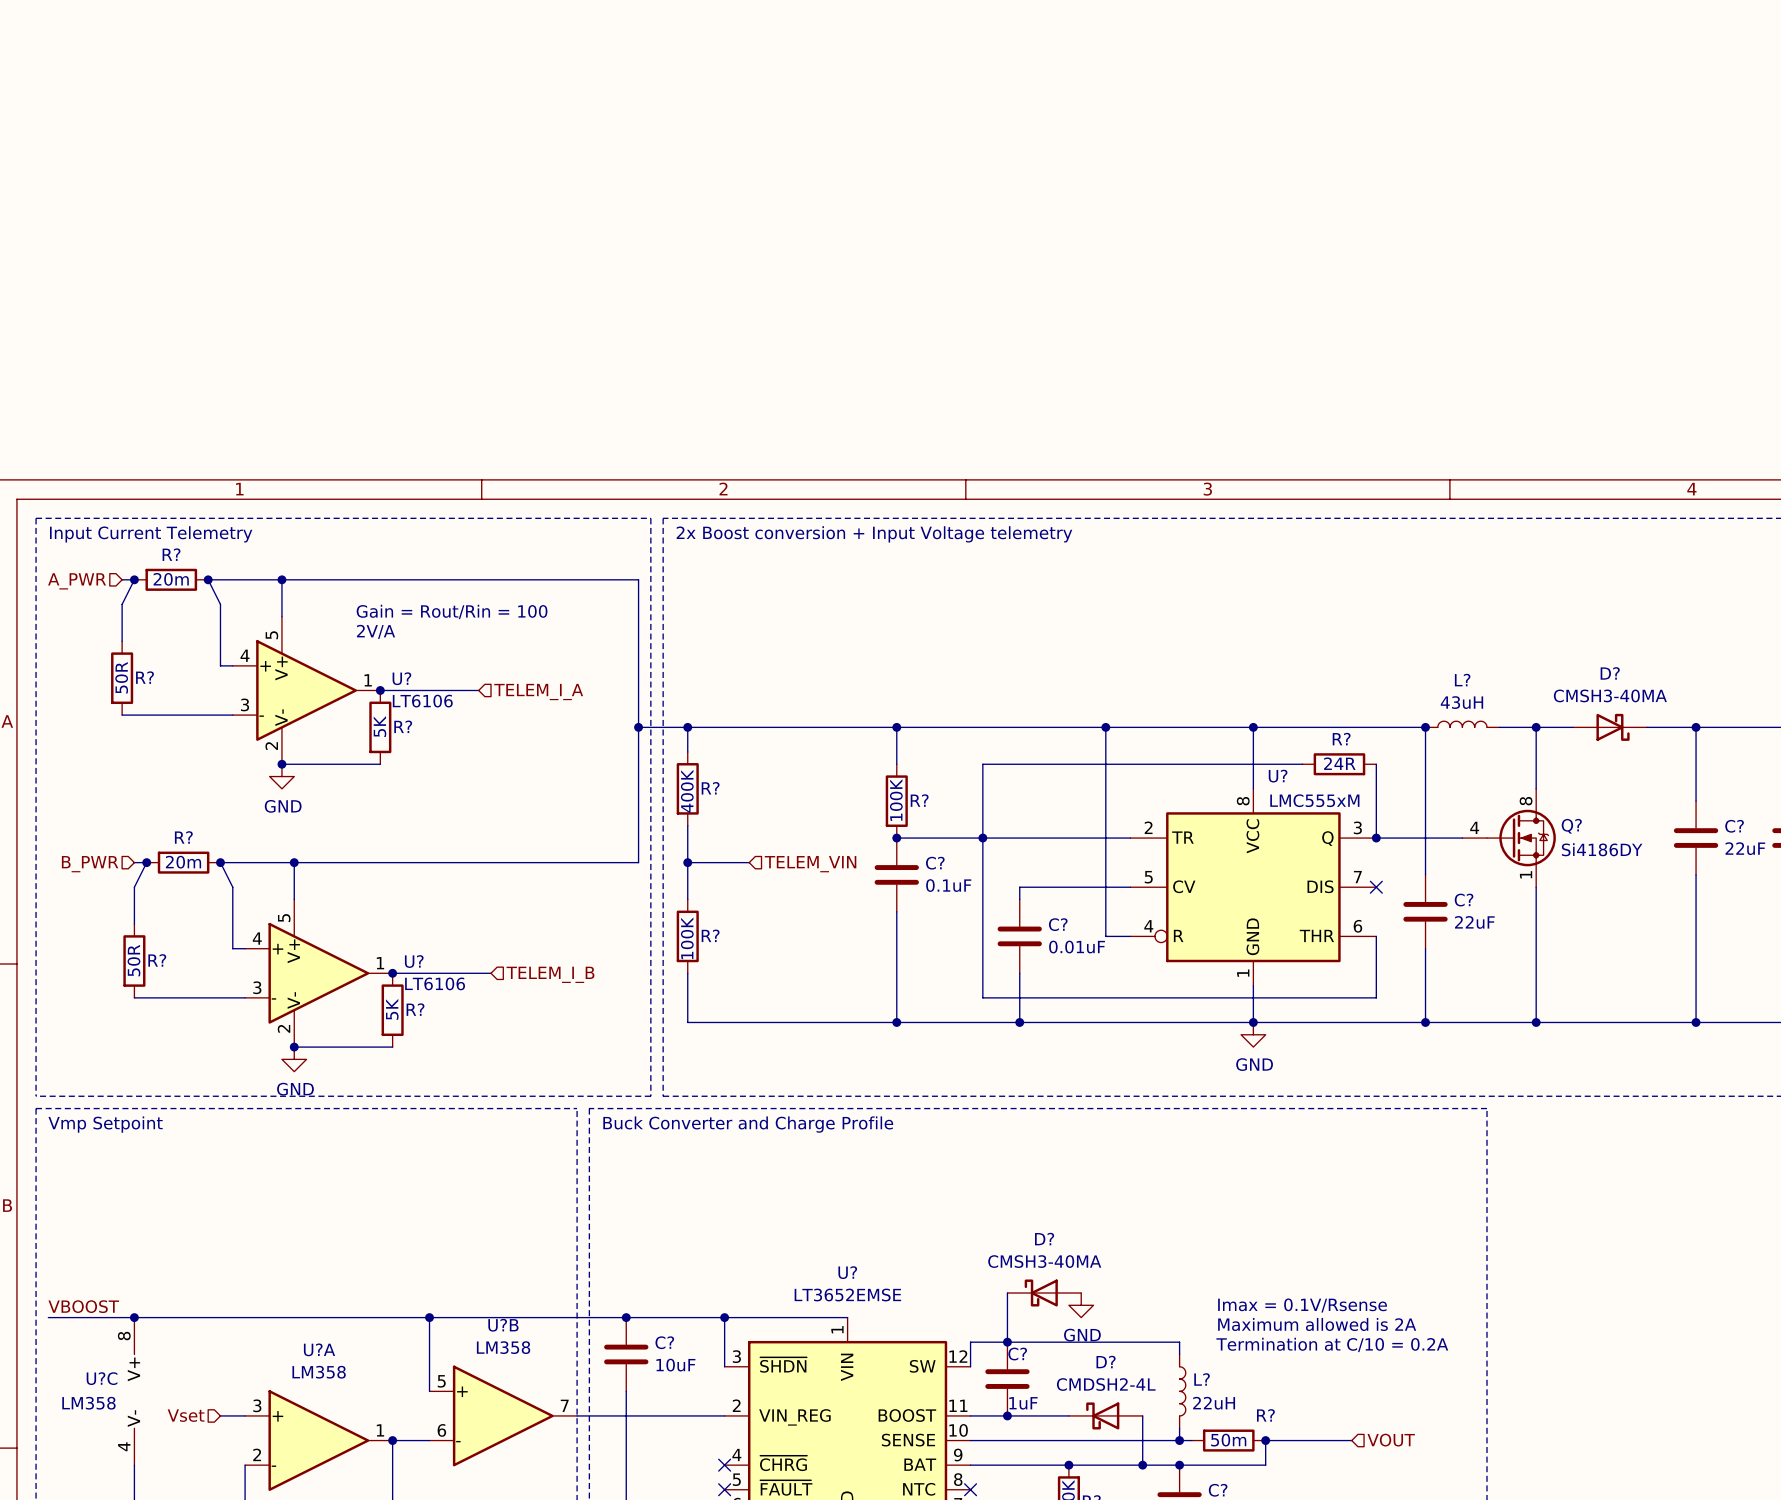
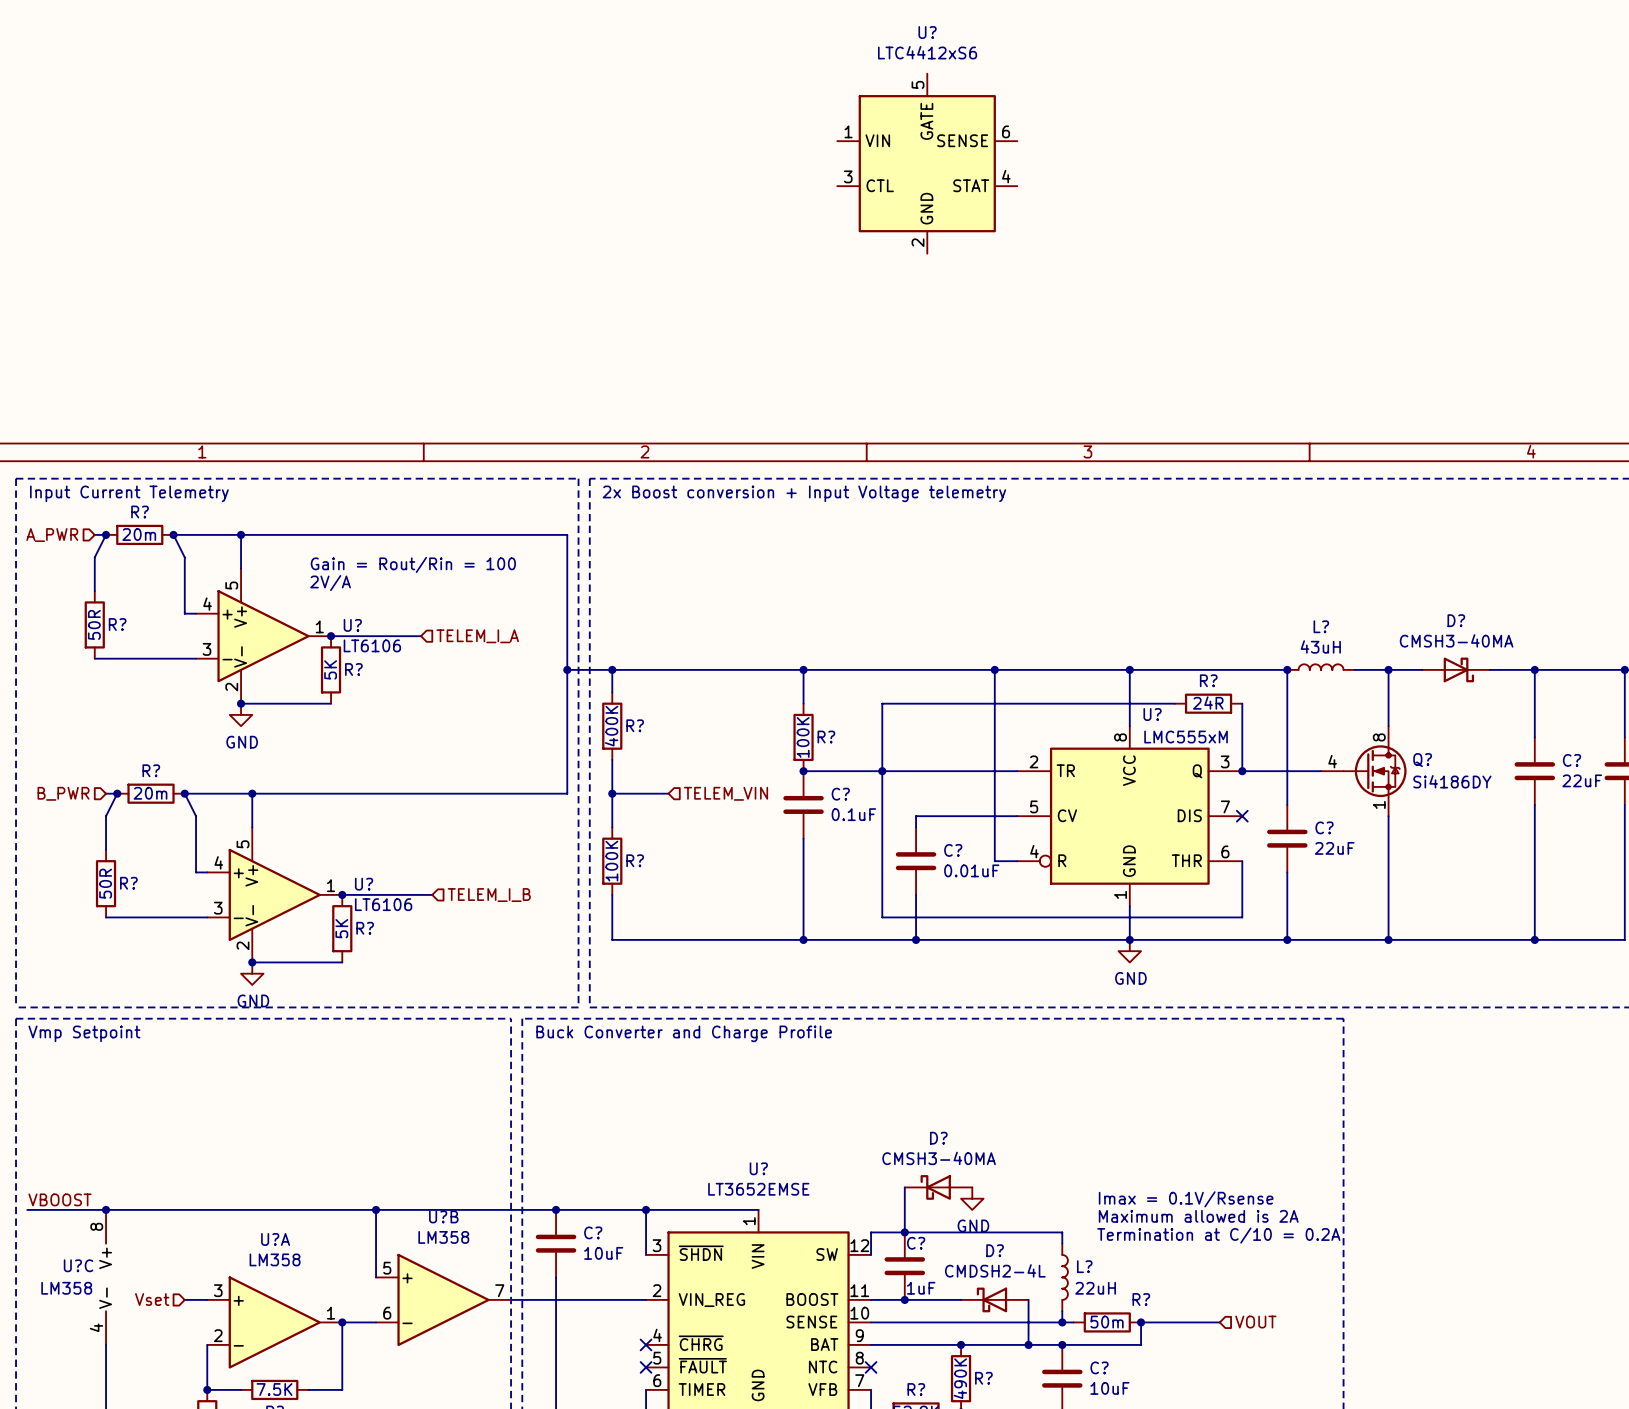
U?: none -> LTC4412xS6 (927, 163)

